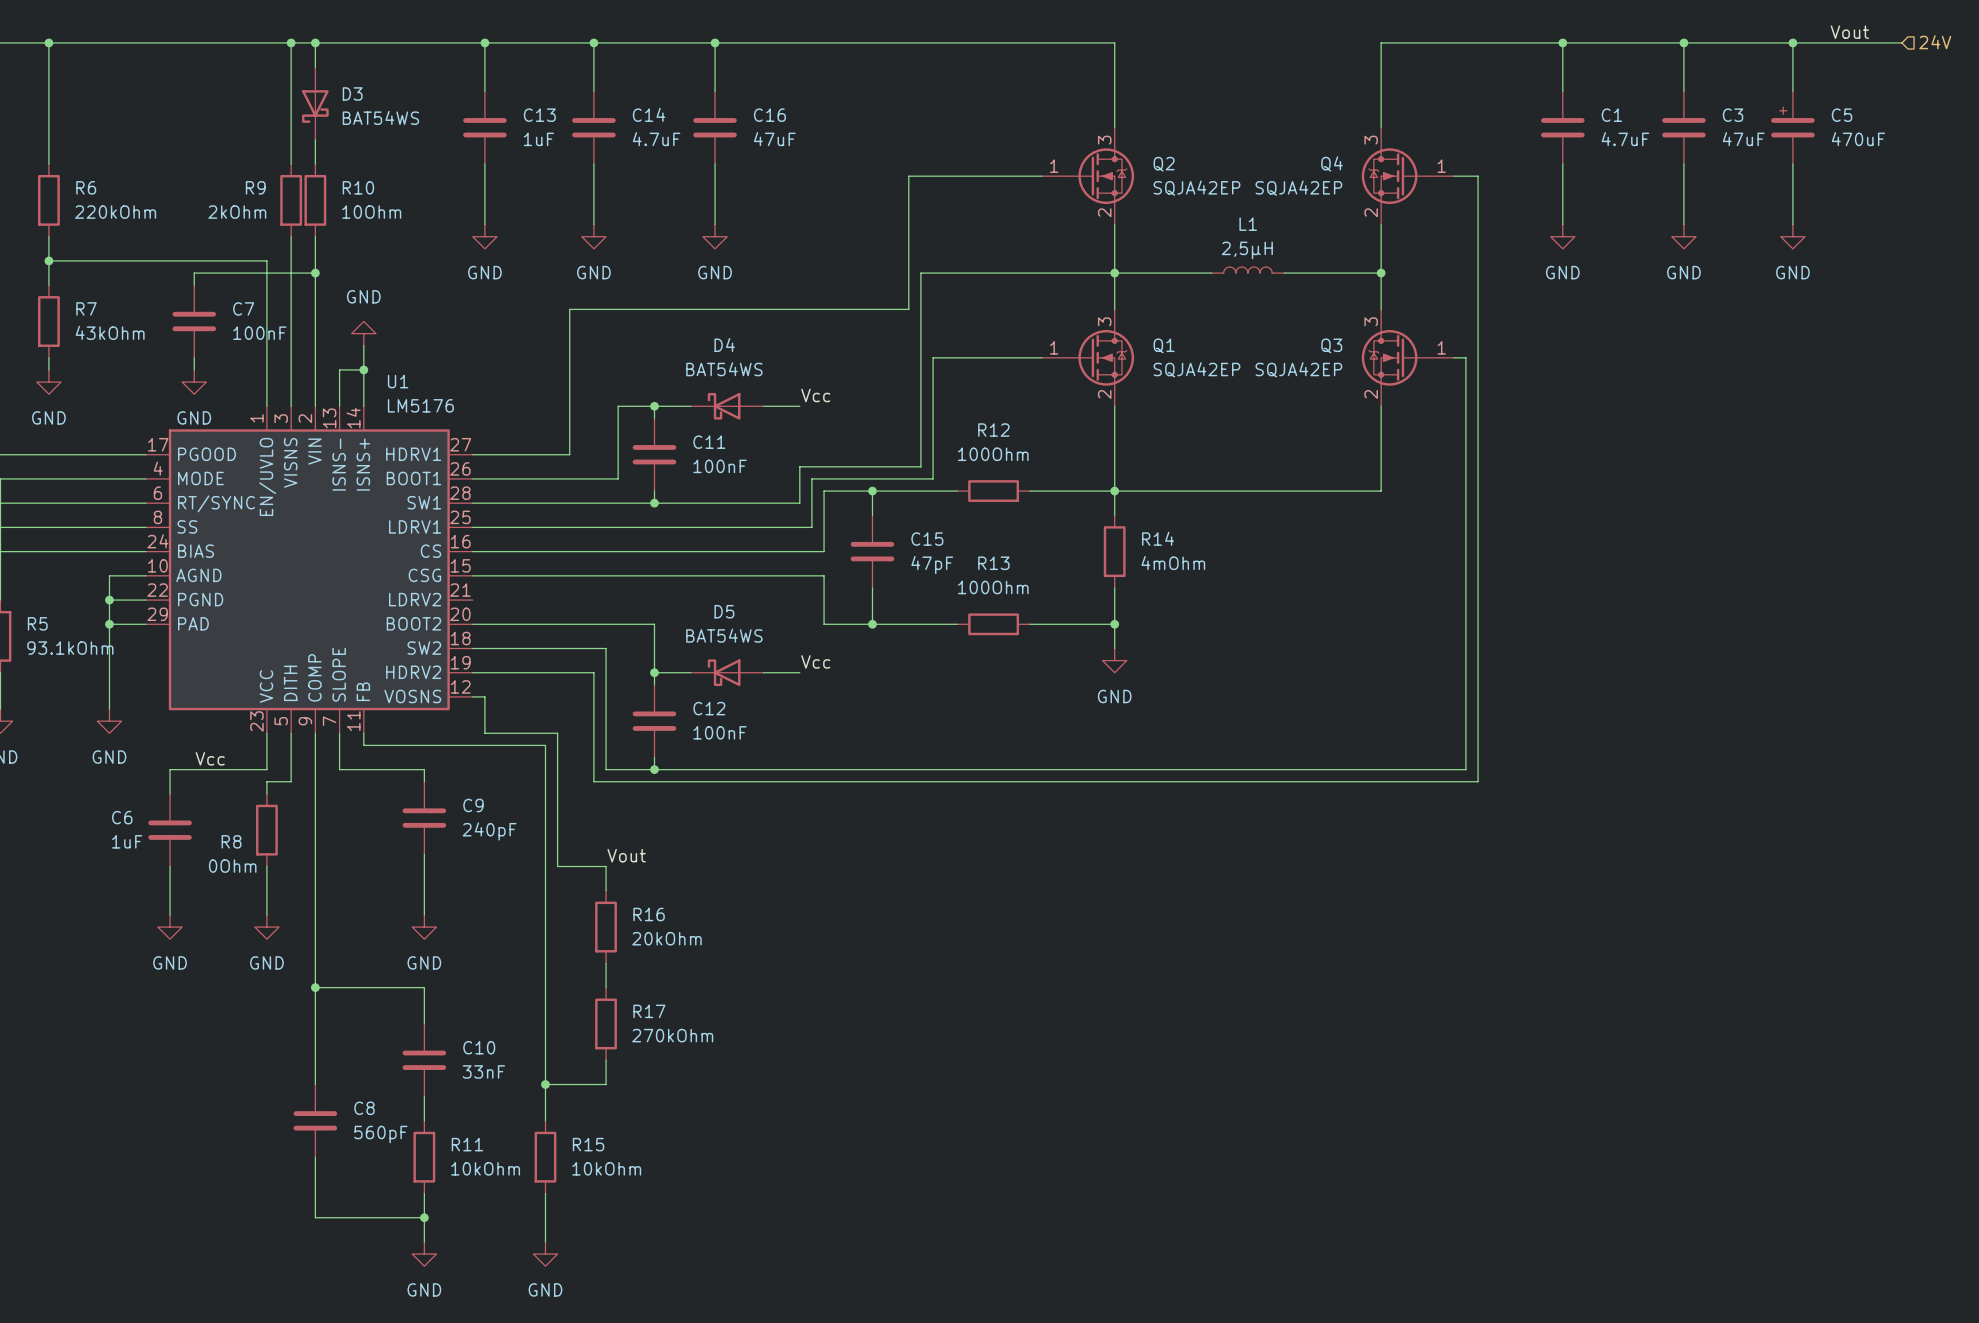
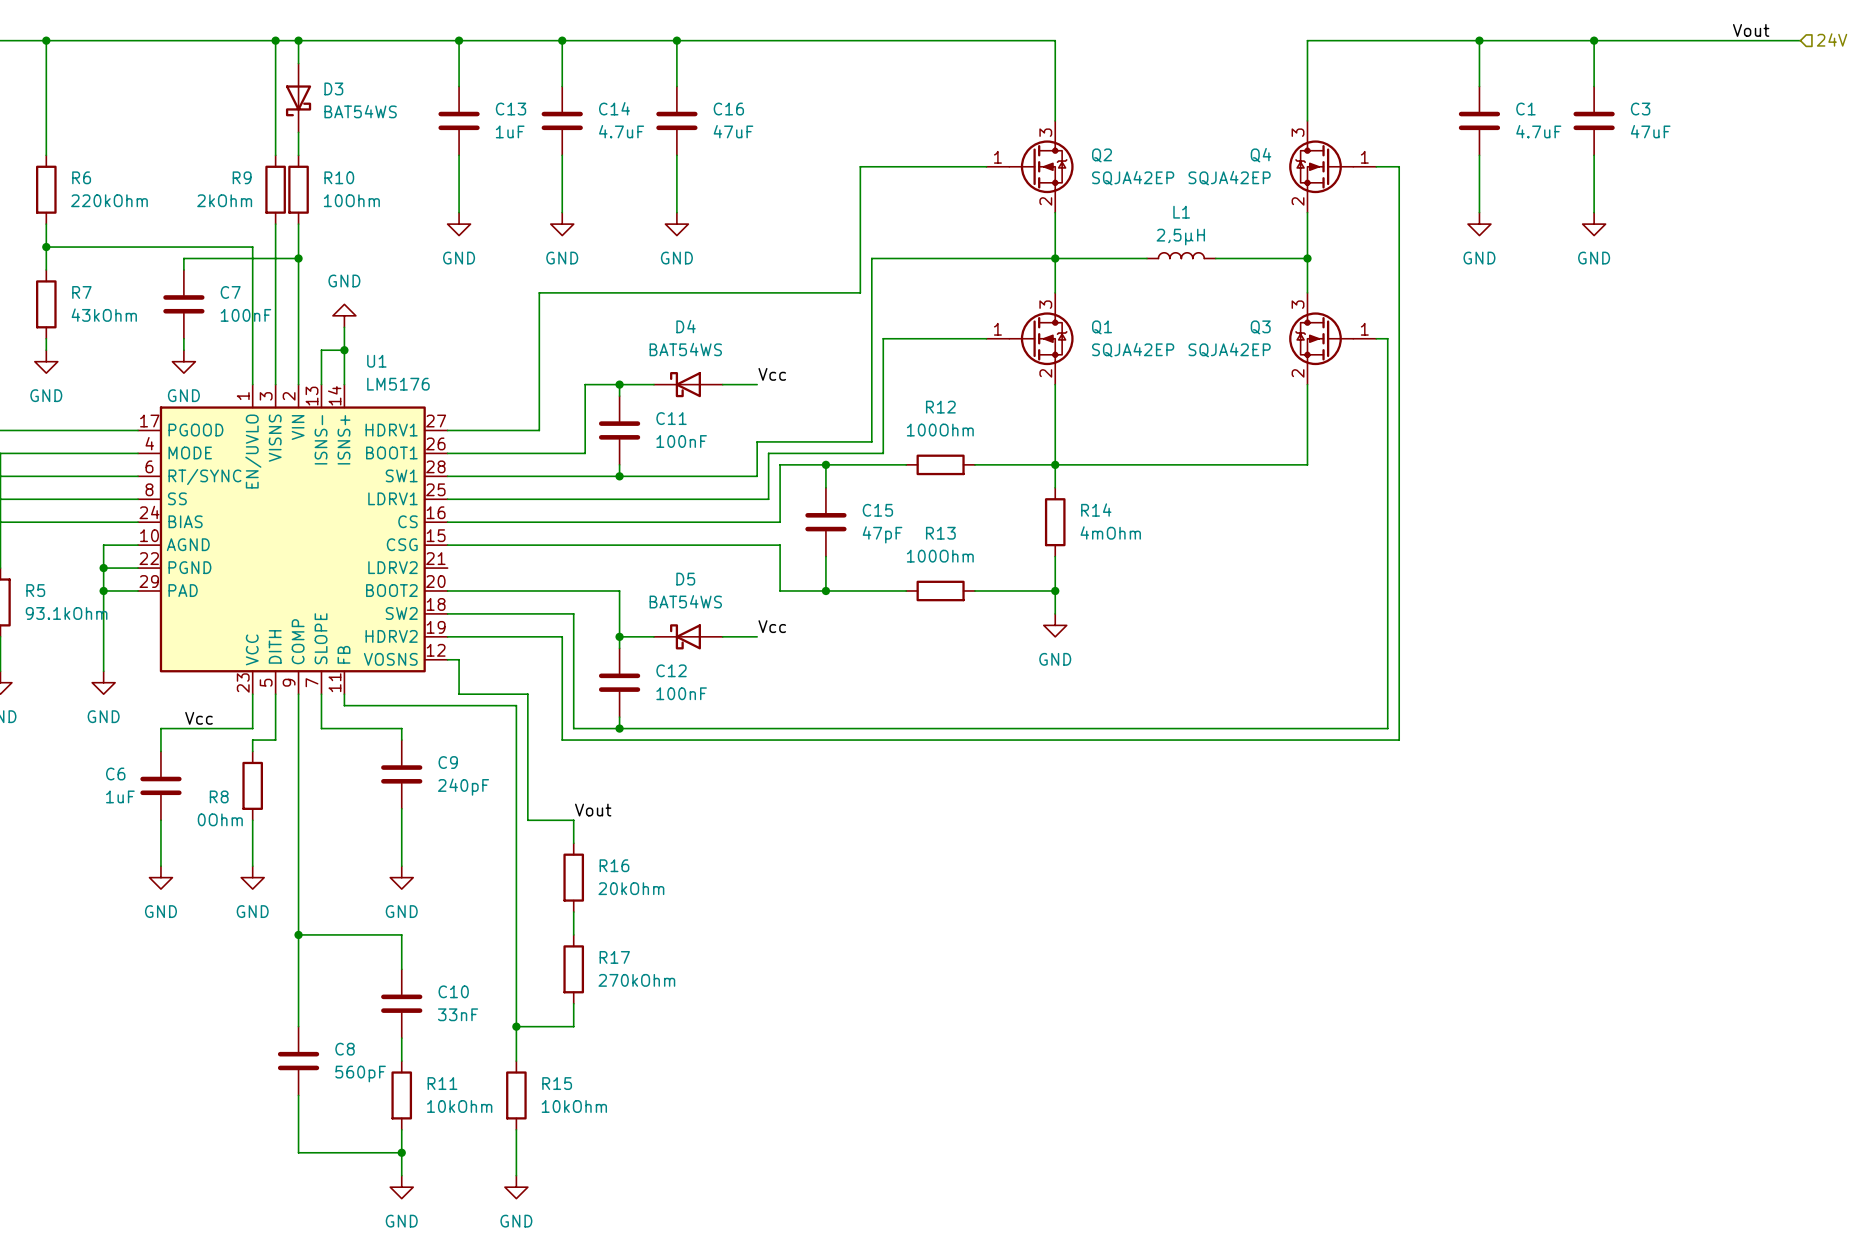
wire: (1792, 42) (1792, 91) -> none
junction: (1792, 42) -> none
C5: 470uF (1792, 127) -> none
wire: (1792, 164) (1792, 224) -> none
power symbol: GND (1792, 236) -> none

